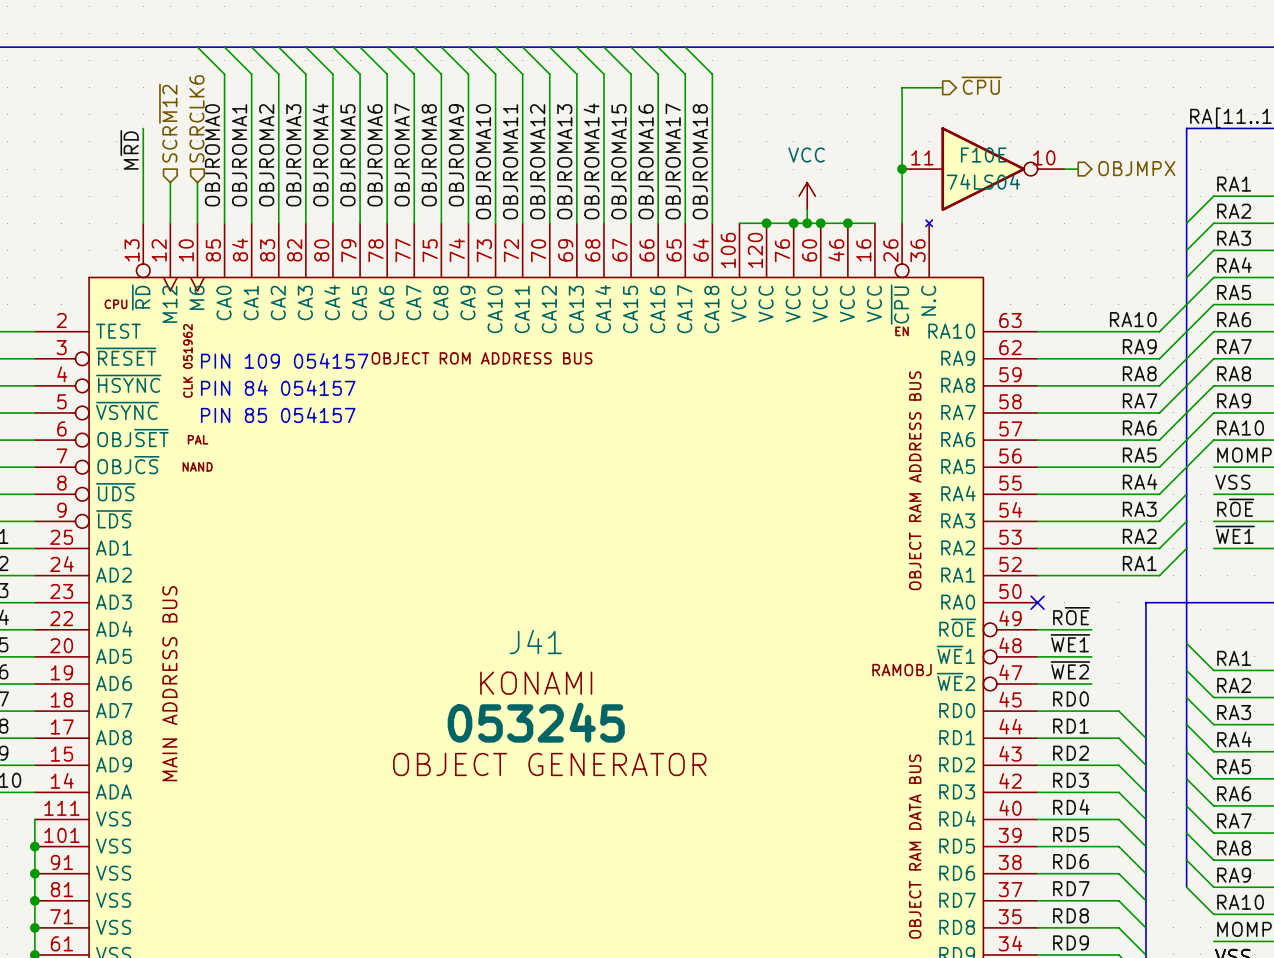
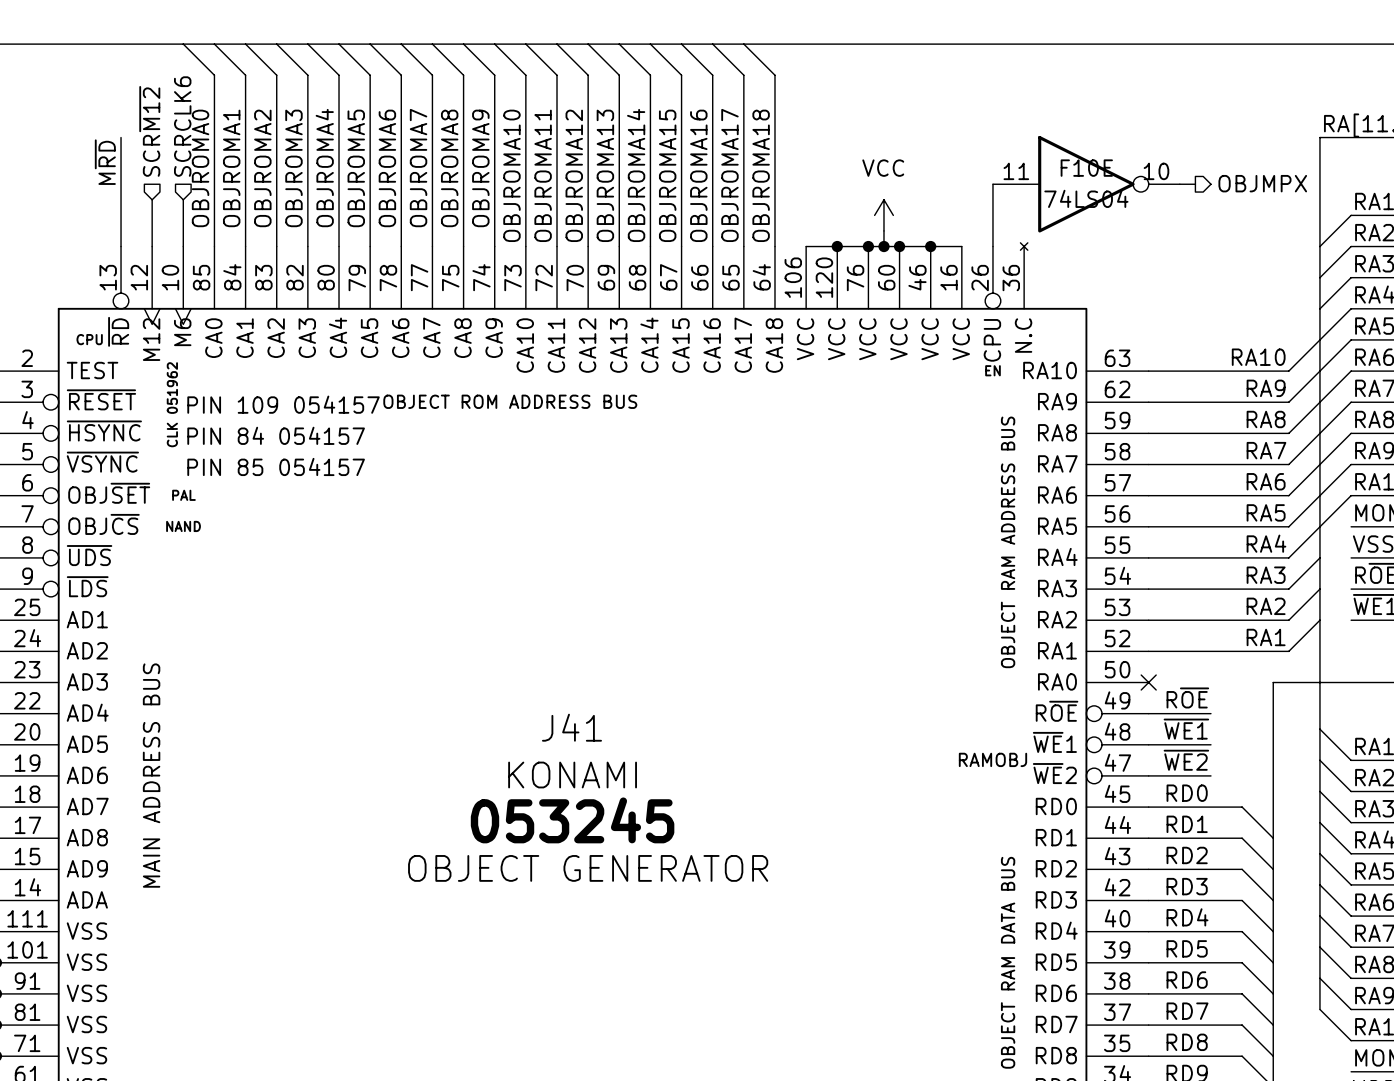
hierarchical label: ~{CPU} (981, 85) -> none
wire: (942, 87) (902, 87) (902, 169) -> none
junction: (902, 169) -> none
J41 pin name: ~{CPU} (900, 304) -> CPU (992, 340)

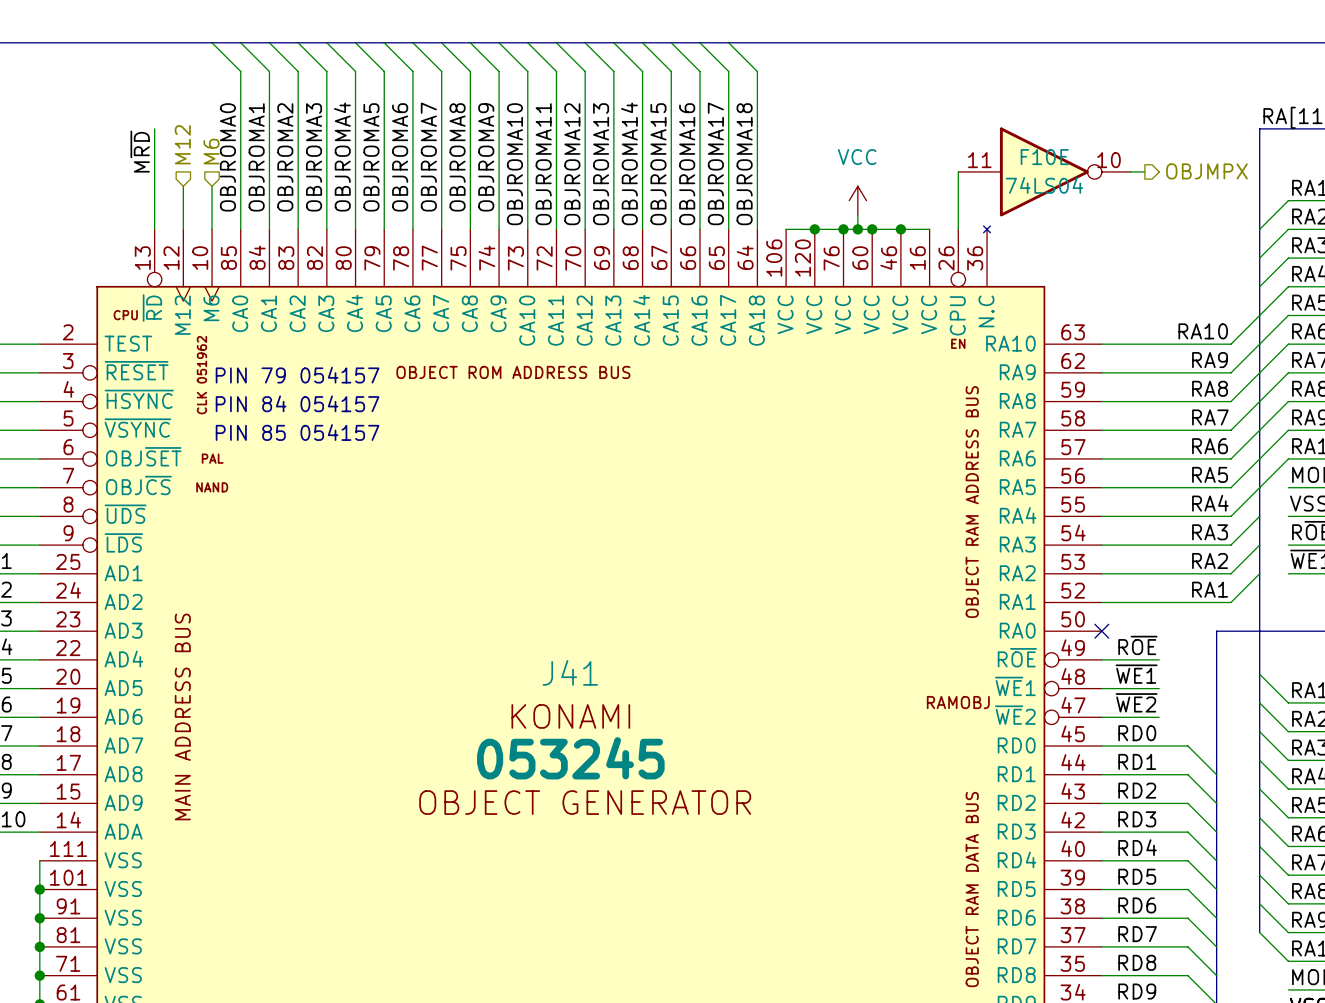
hierarchical label: SCRCLK6 (182, 126) -> M6 (211, 151)
hierarchical label: SCR~{M12} (149, 131) -> M12 (182, 144)
text: PIN 109 054157 (283, 404) -> PIN 79 054157 (297, 375)

